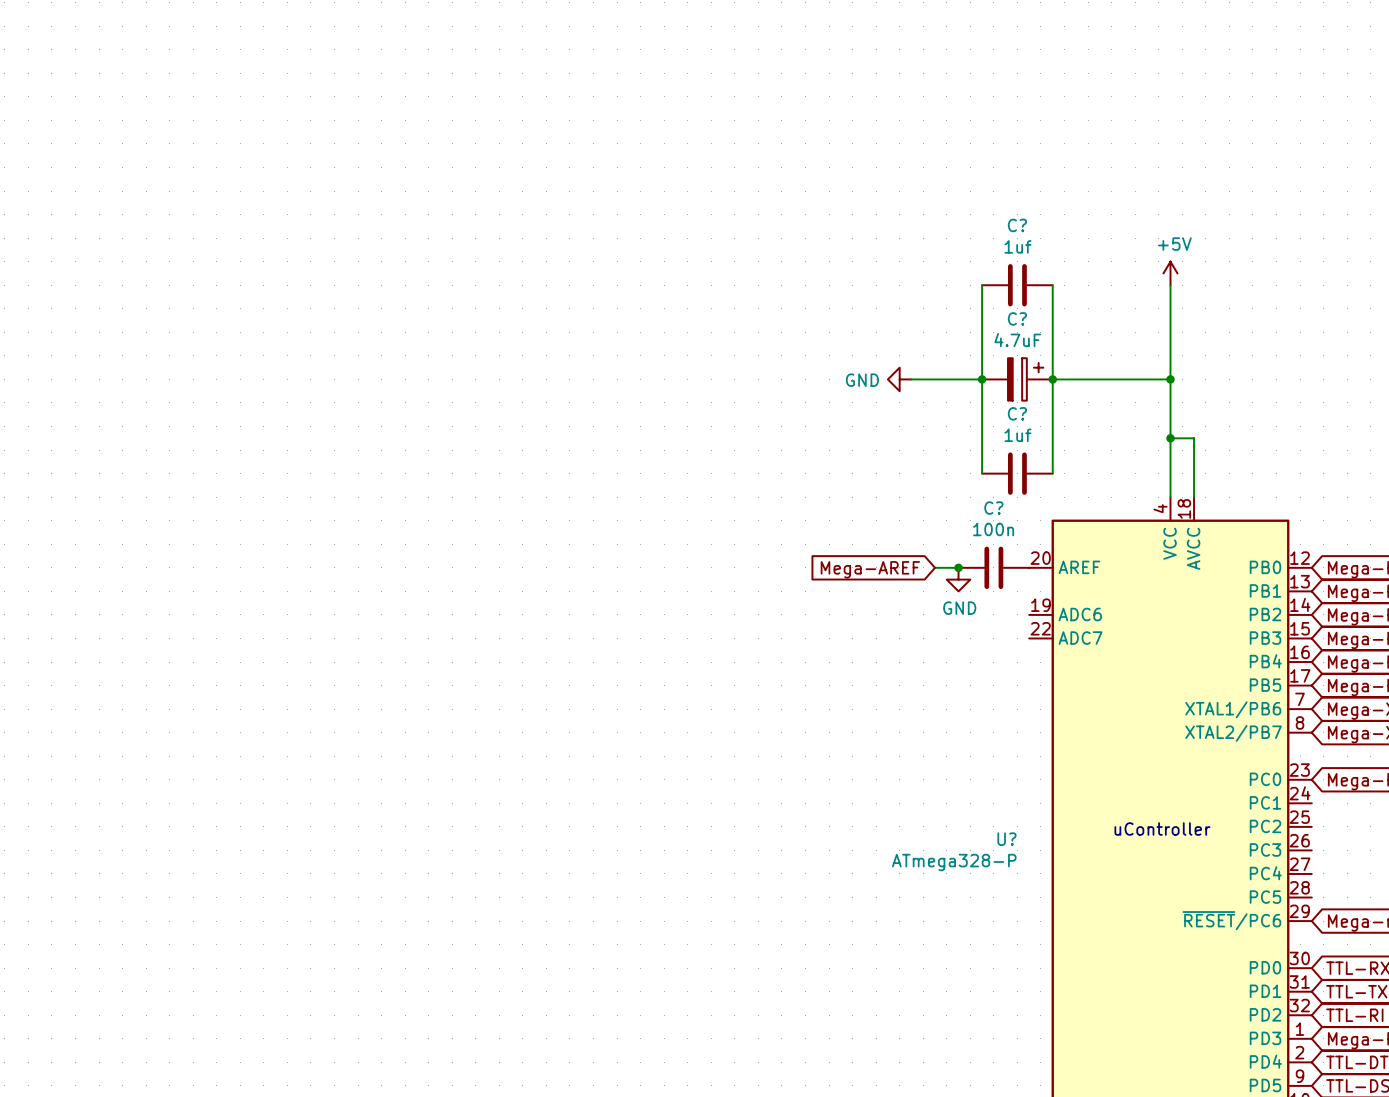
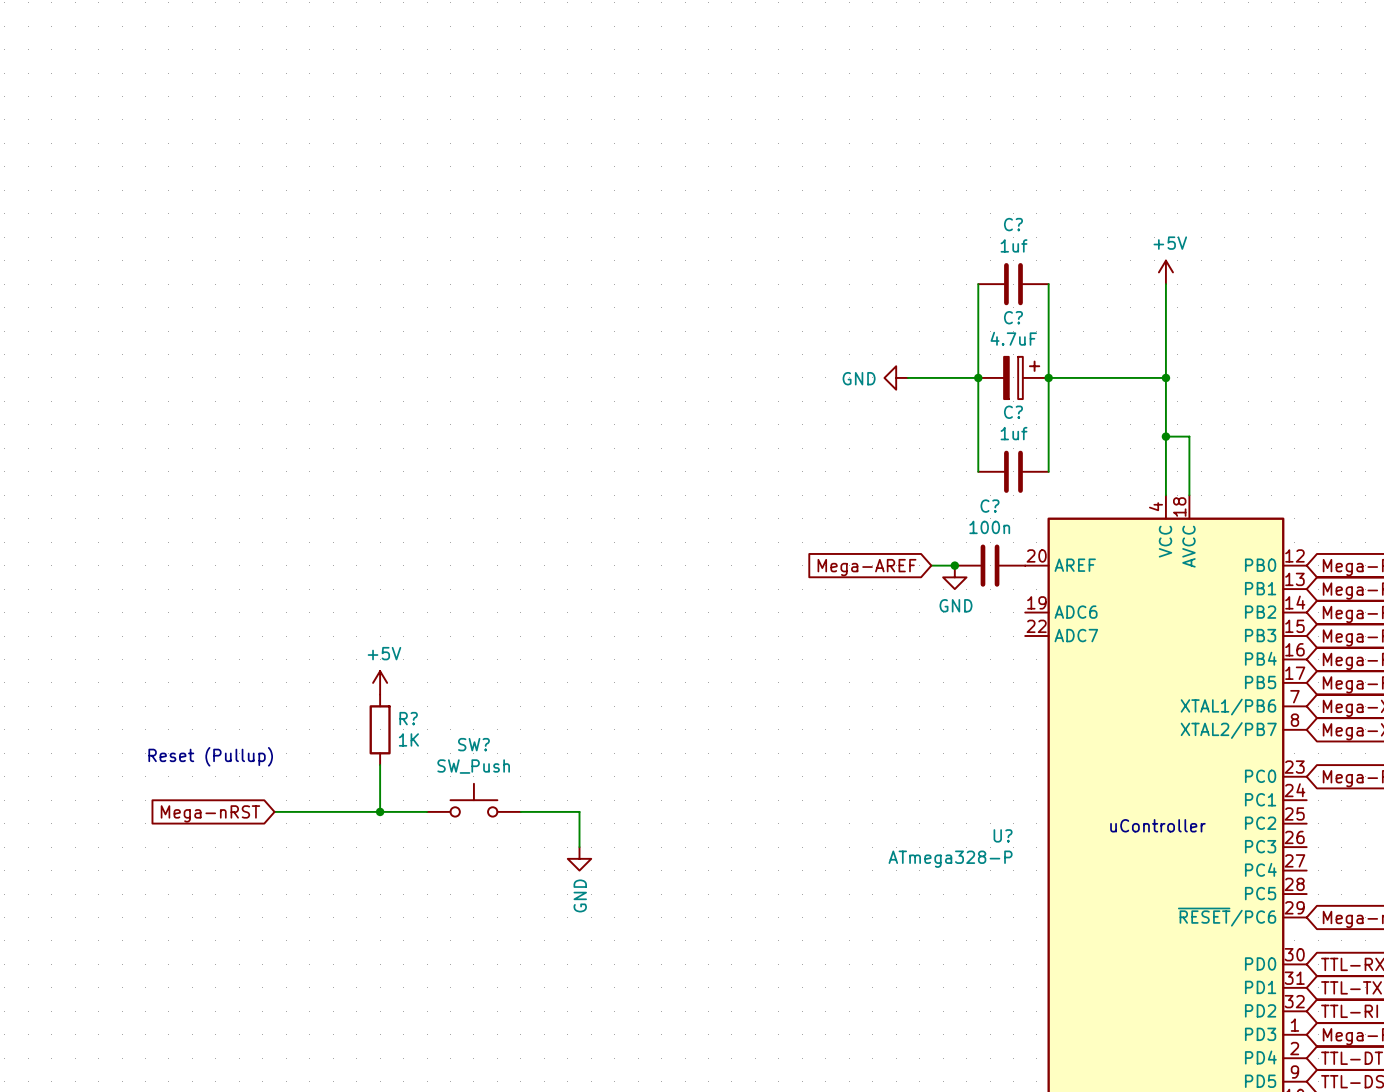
power symbol: none -> +5V (380, 682)
R?: none -> 1K (380, 729)
text: none -> Reset (Pullup) (210, 756)
wire: none -> (380, 765) (380, 811)
SW?: none -> SW_Push (473, 800)
wire: none -> (274, 811) (427, 811)
junction: none -> (380, 811)
wire: none -> (520, 811) (579, 811) (579, 847)
global label: none -> Mega-nRST (210, 813)
power symbol: none -> GND (579, 858)

